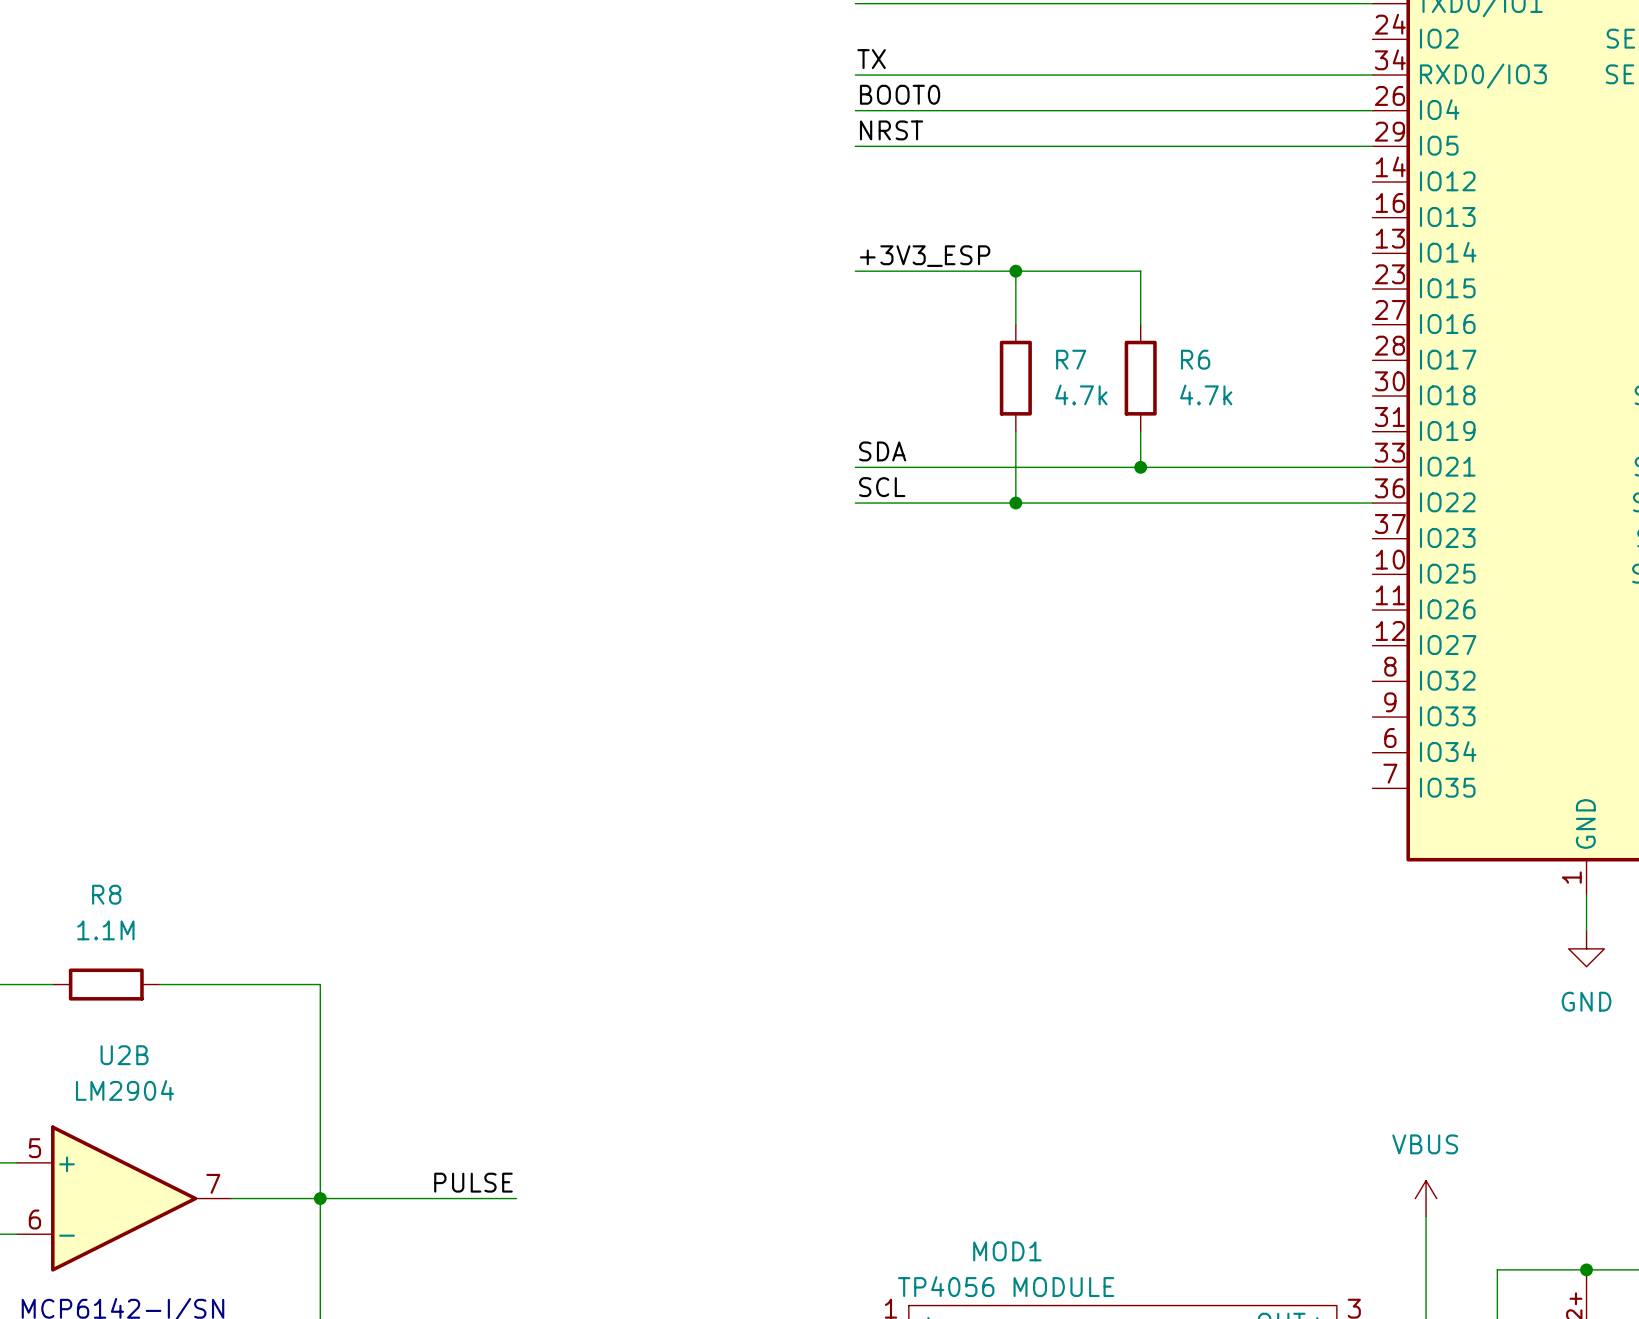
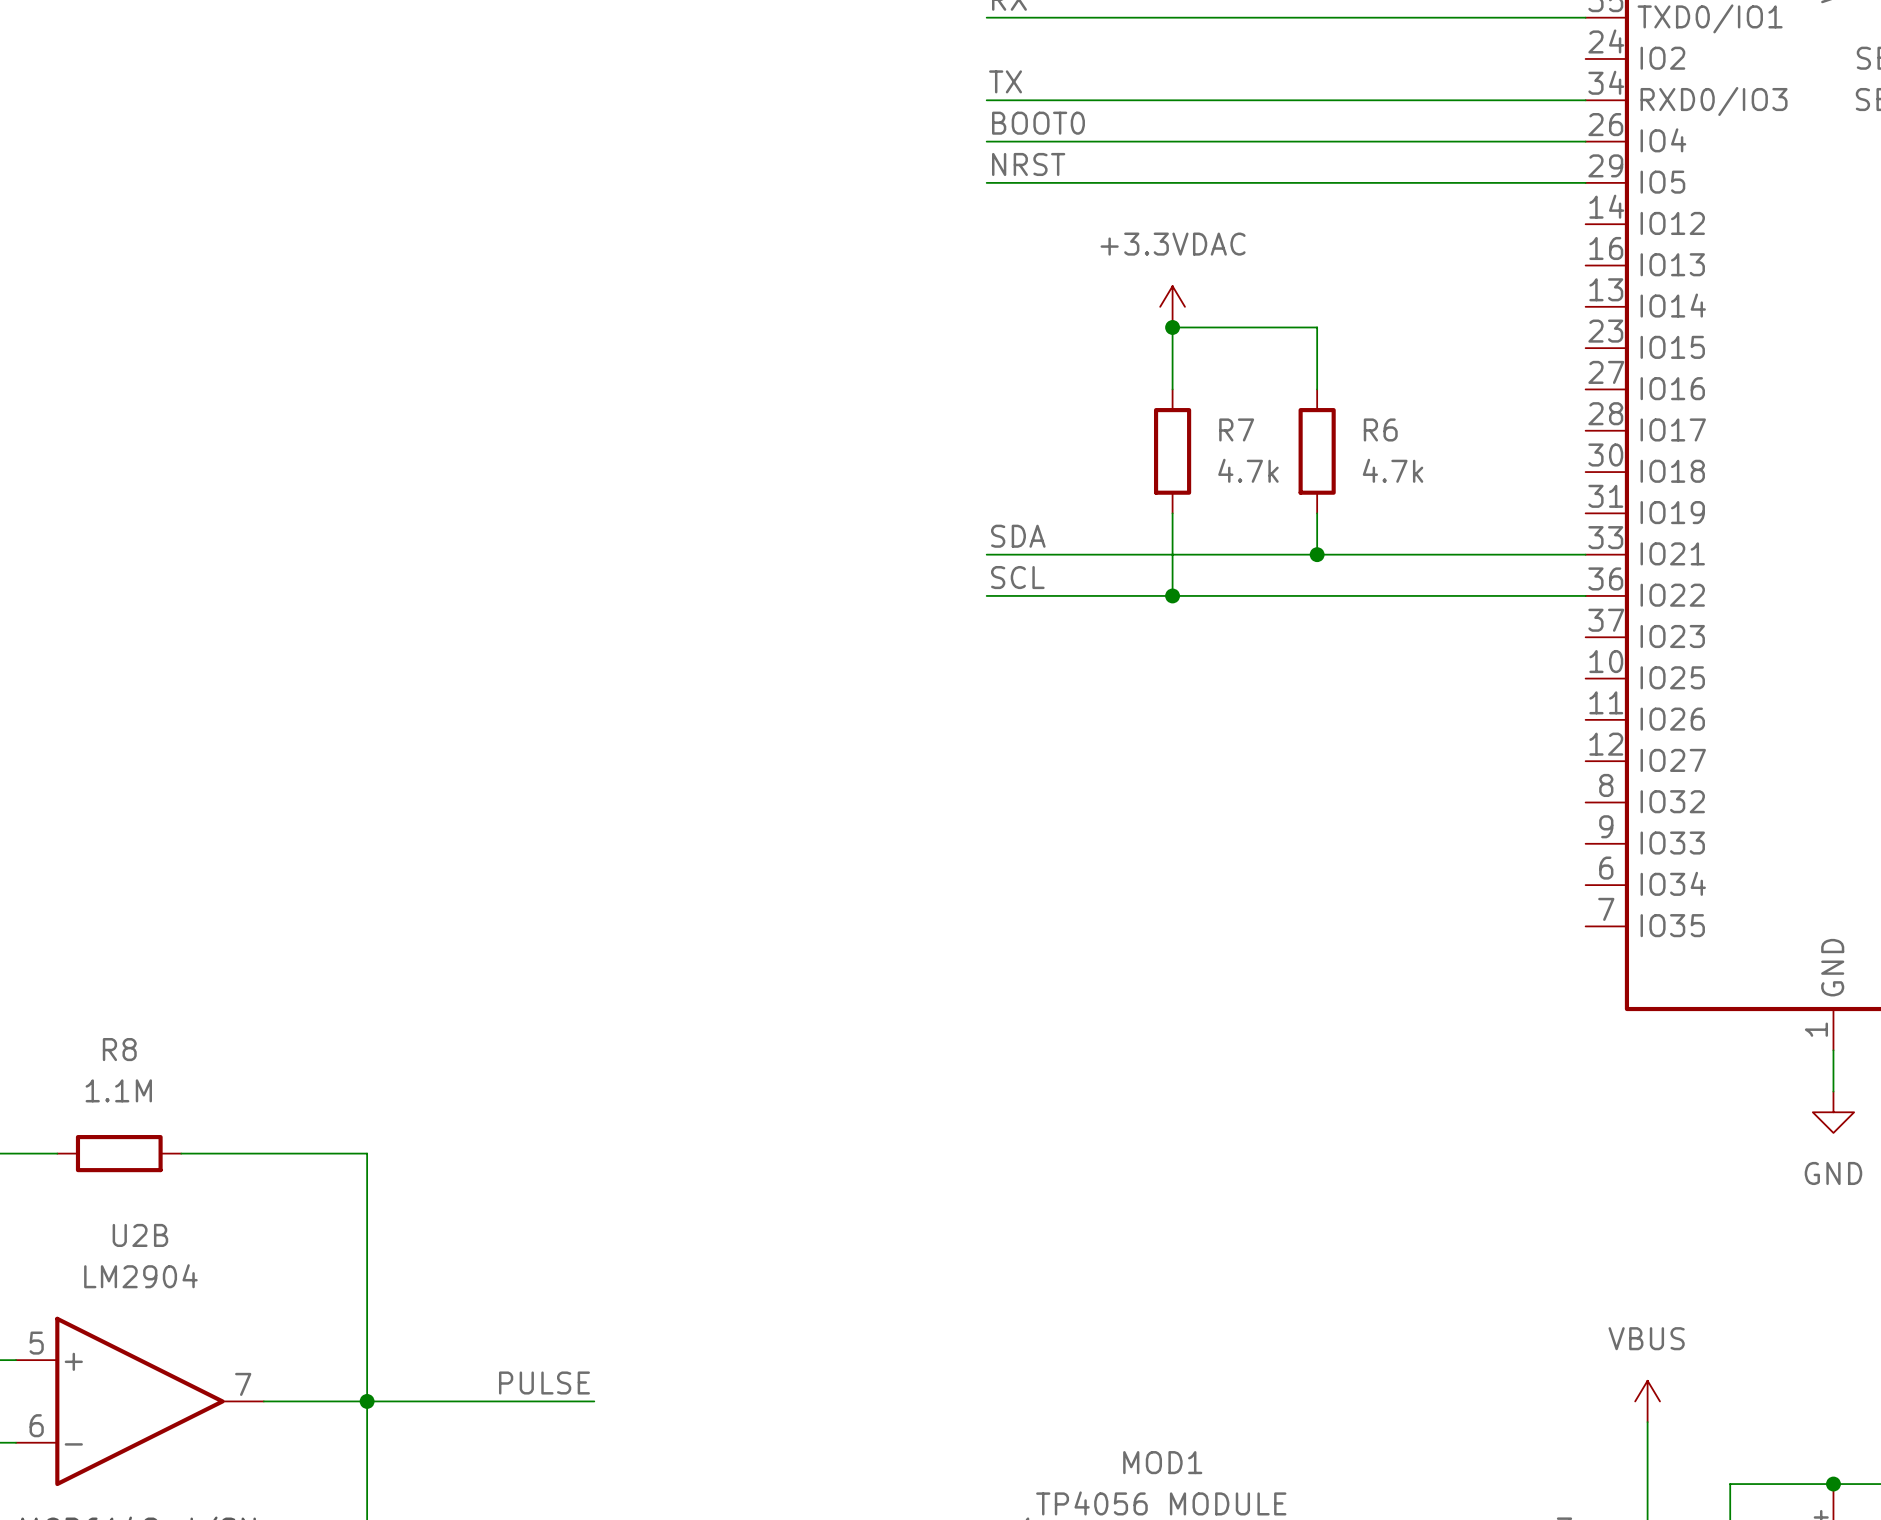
power symbol: none -> +3.3VDAC (1172, 306)
label: +3V3_ESP (925, 256) -> none
wire: (855, 271) (1015, 271) -> none

